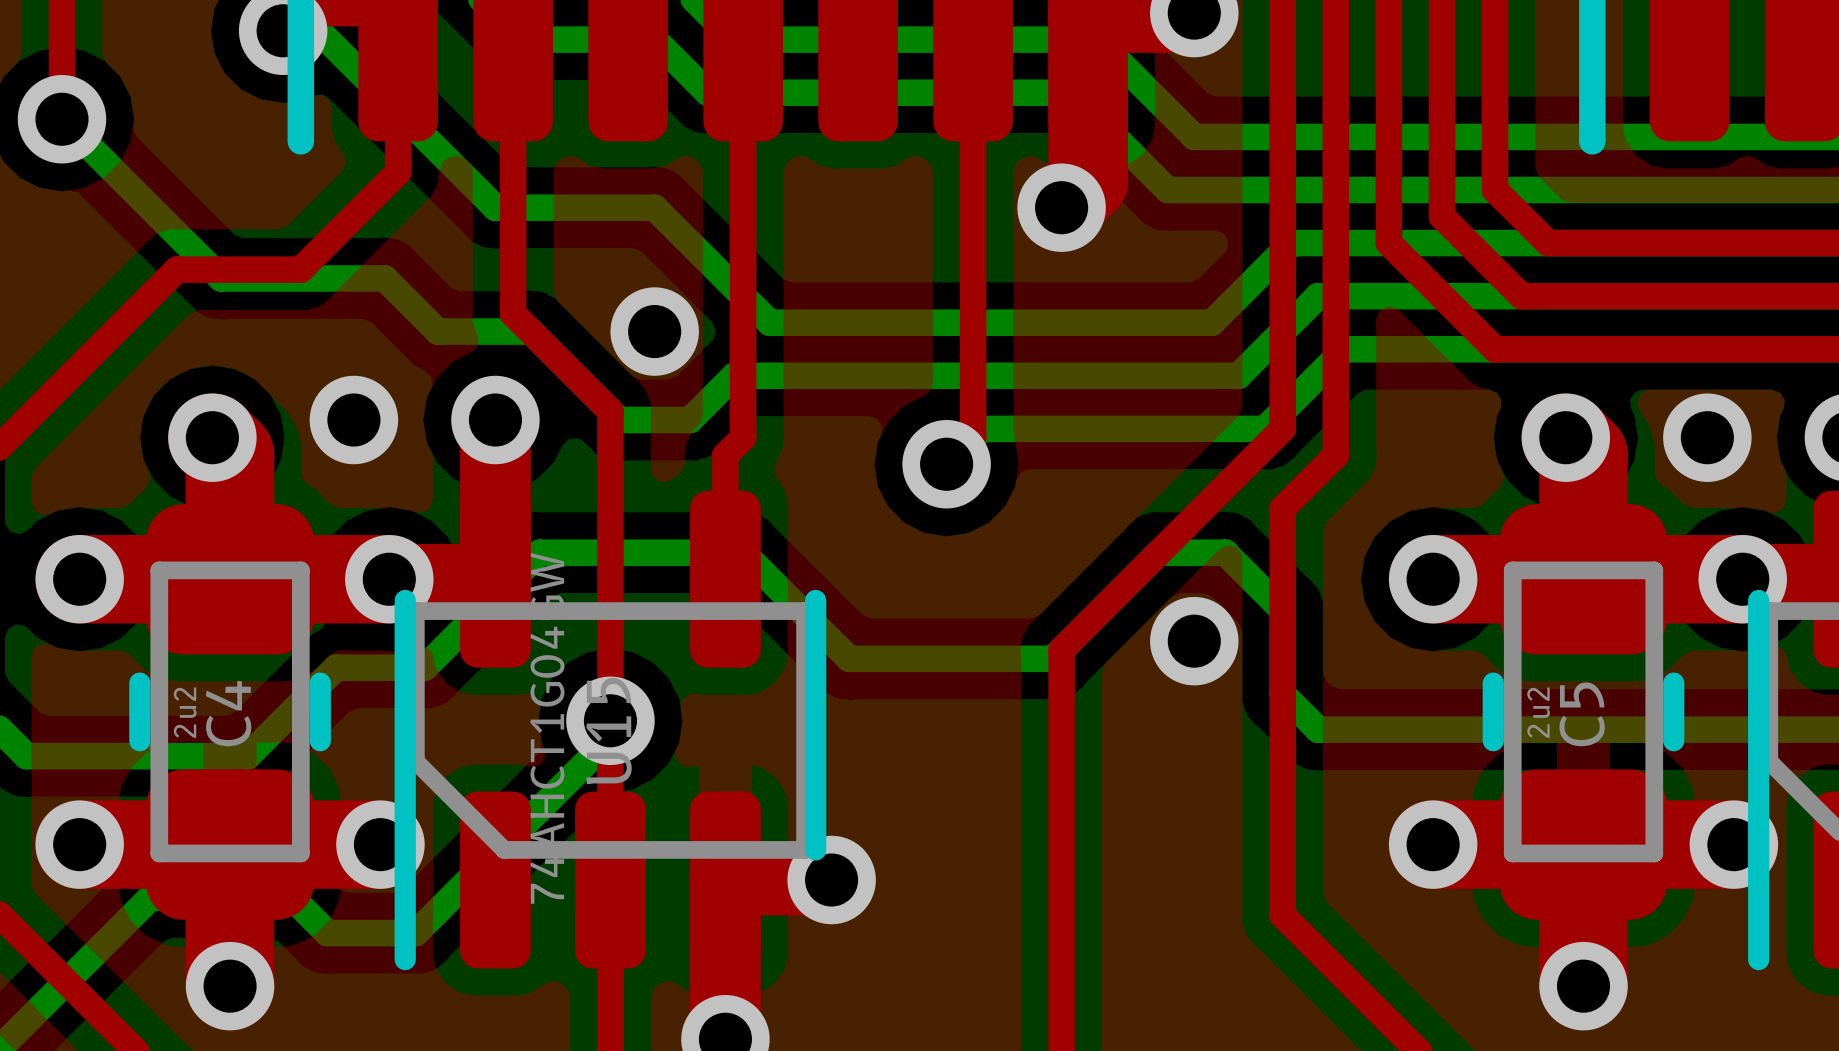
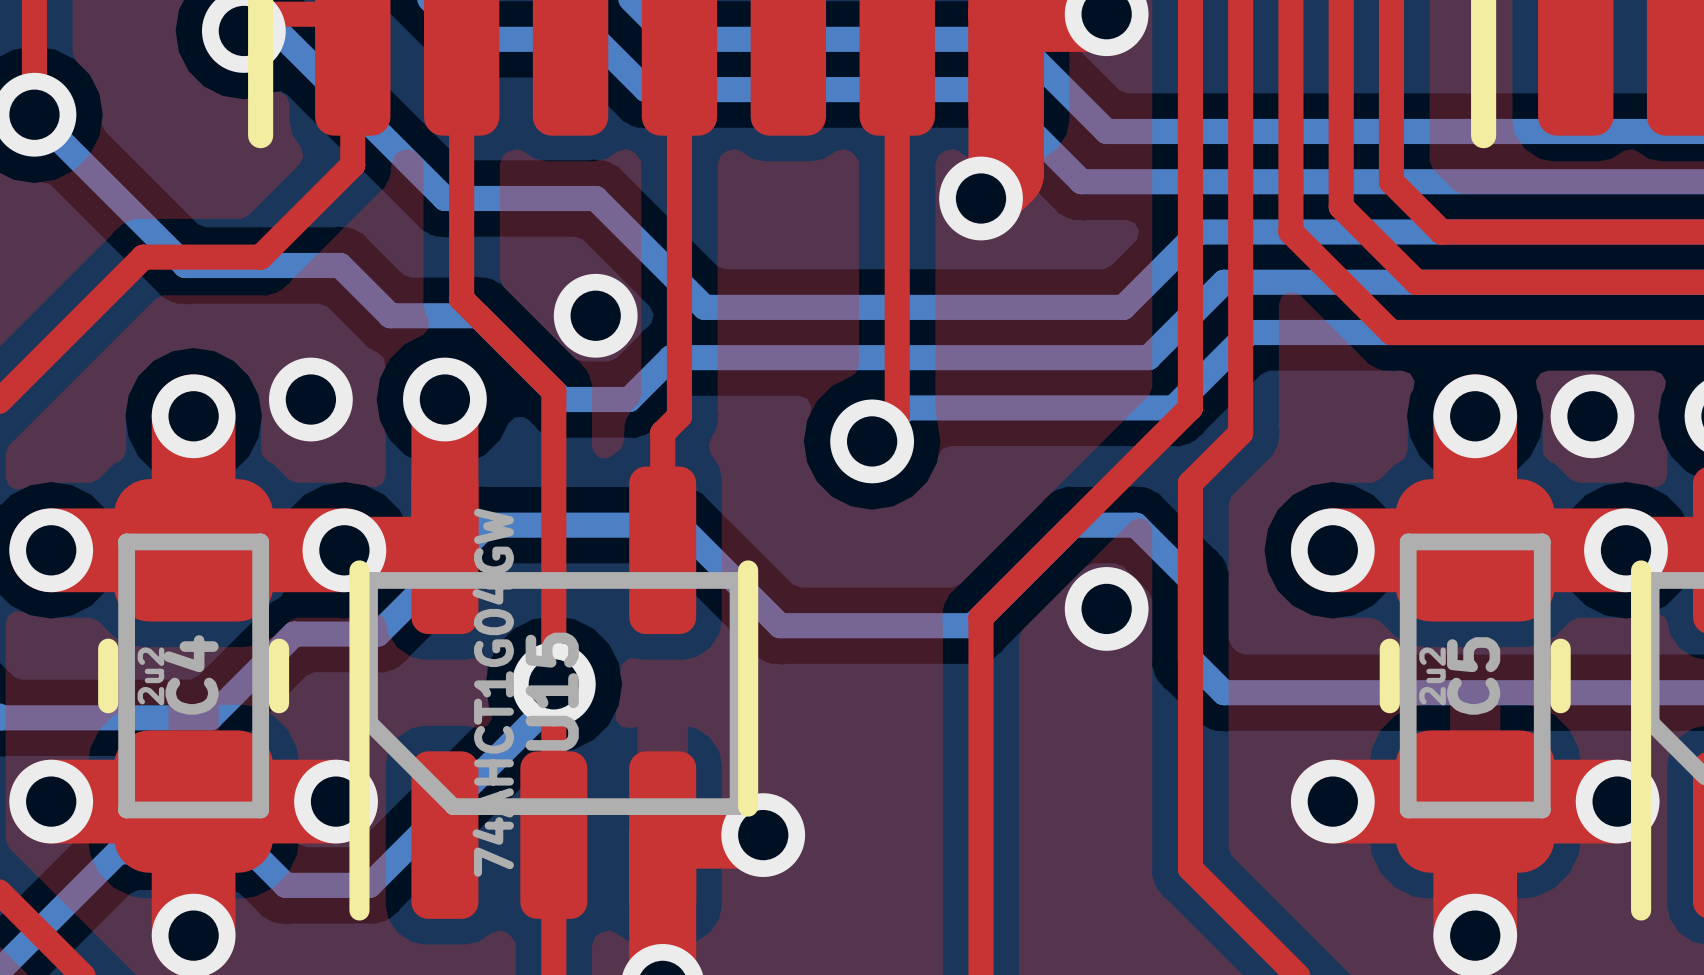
via position: (212, 437) -> (193, 416)
via position: (1565, 437) -> (1475, 416)

